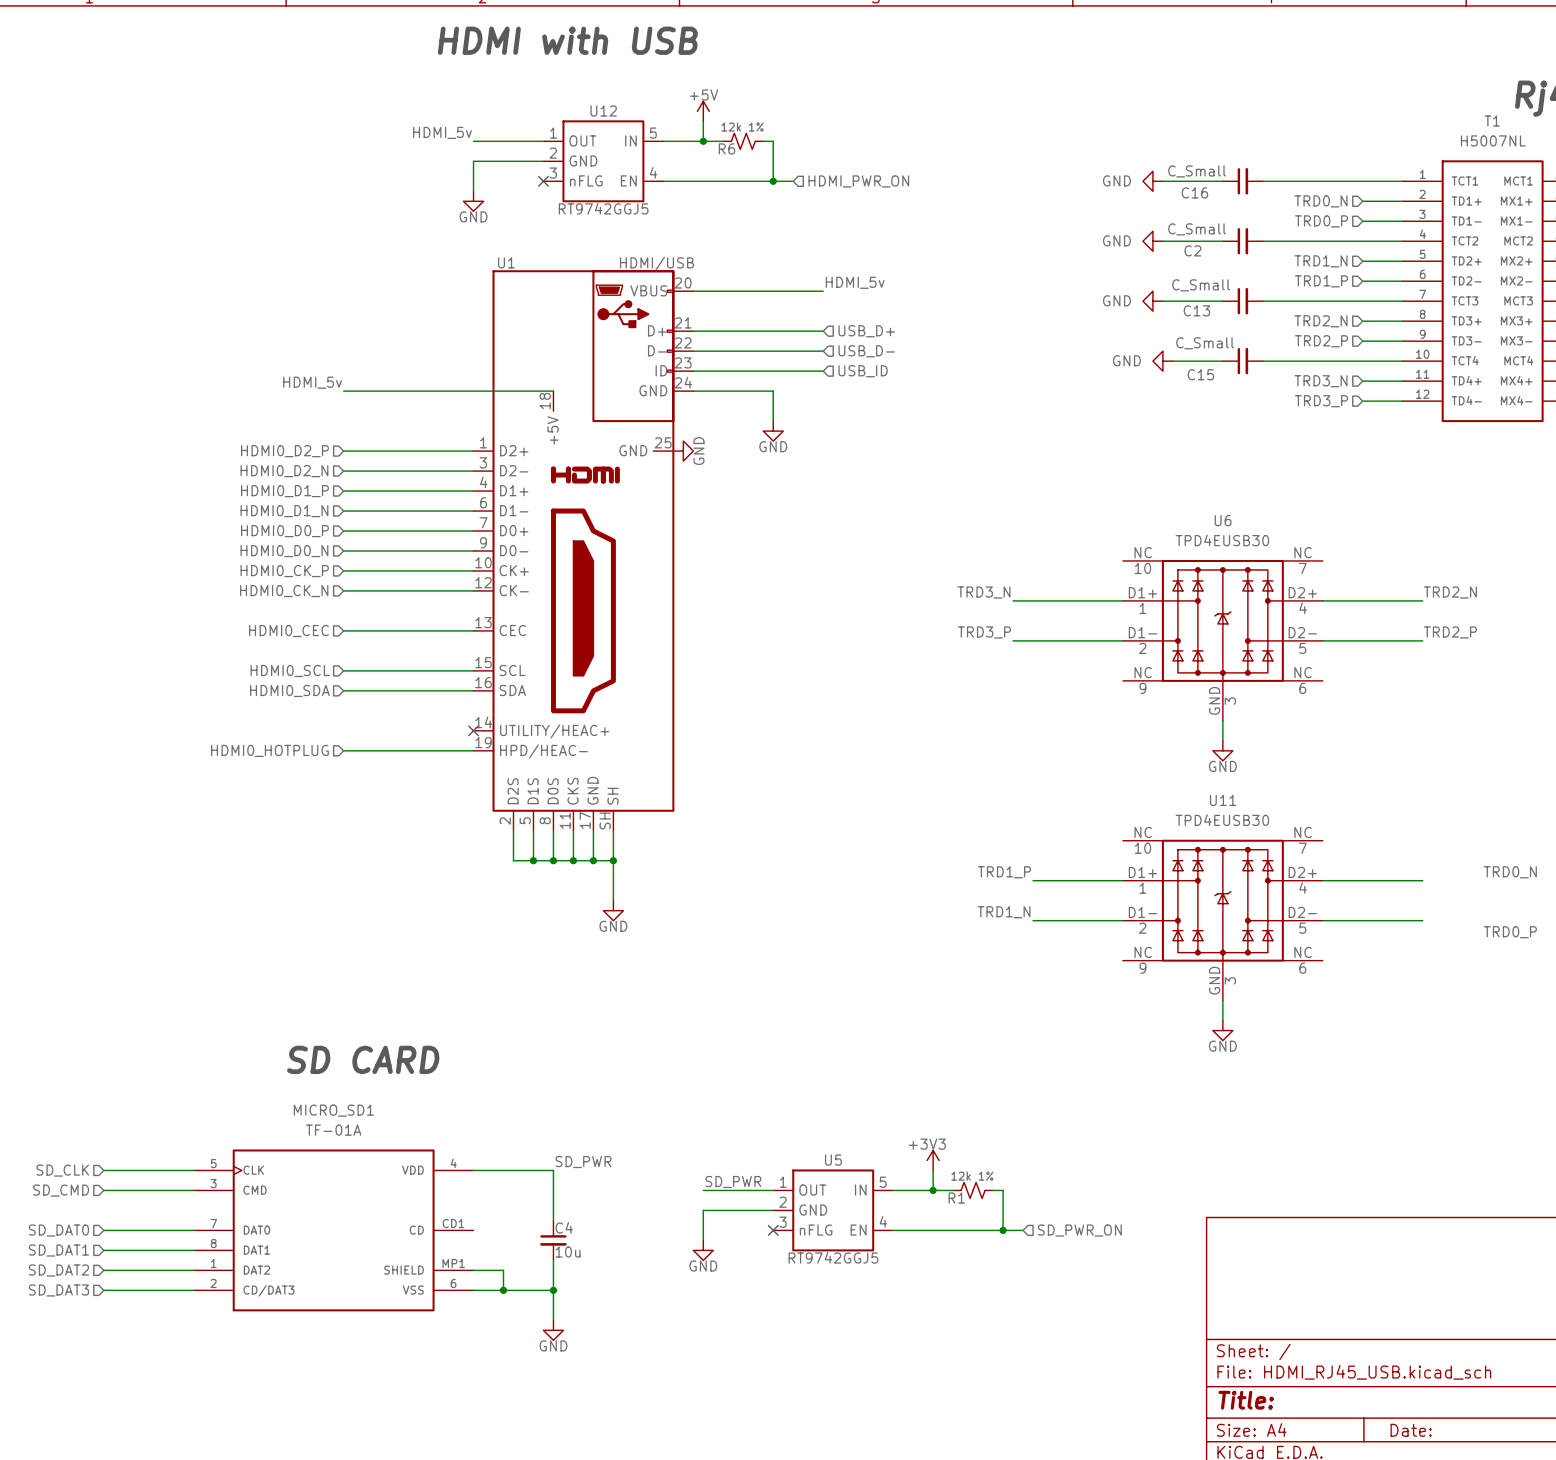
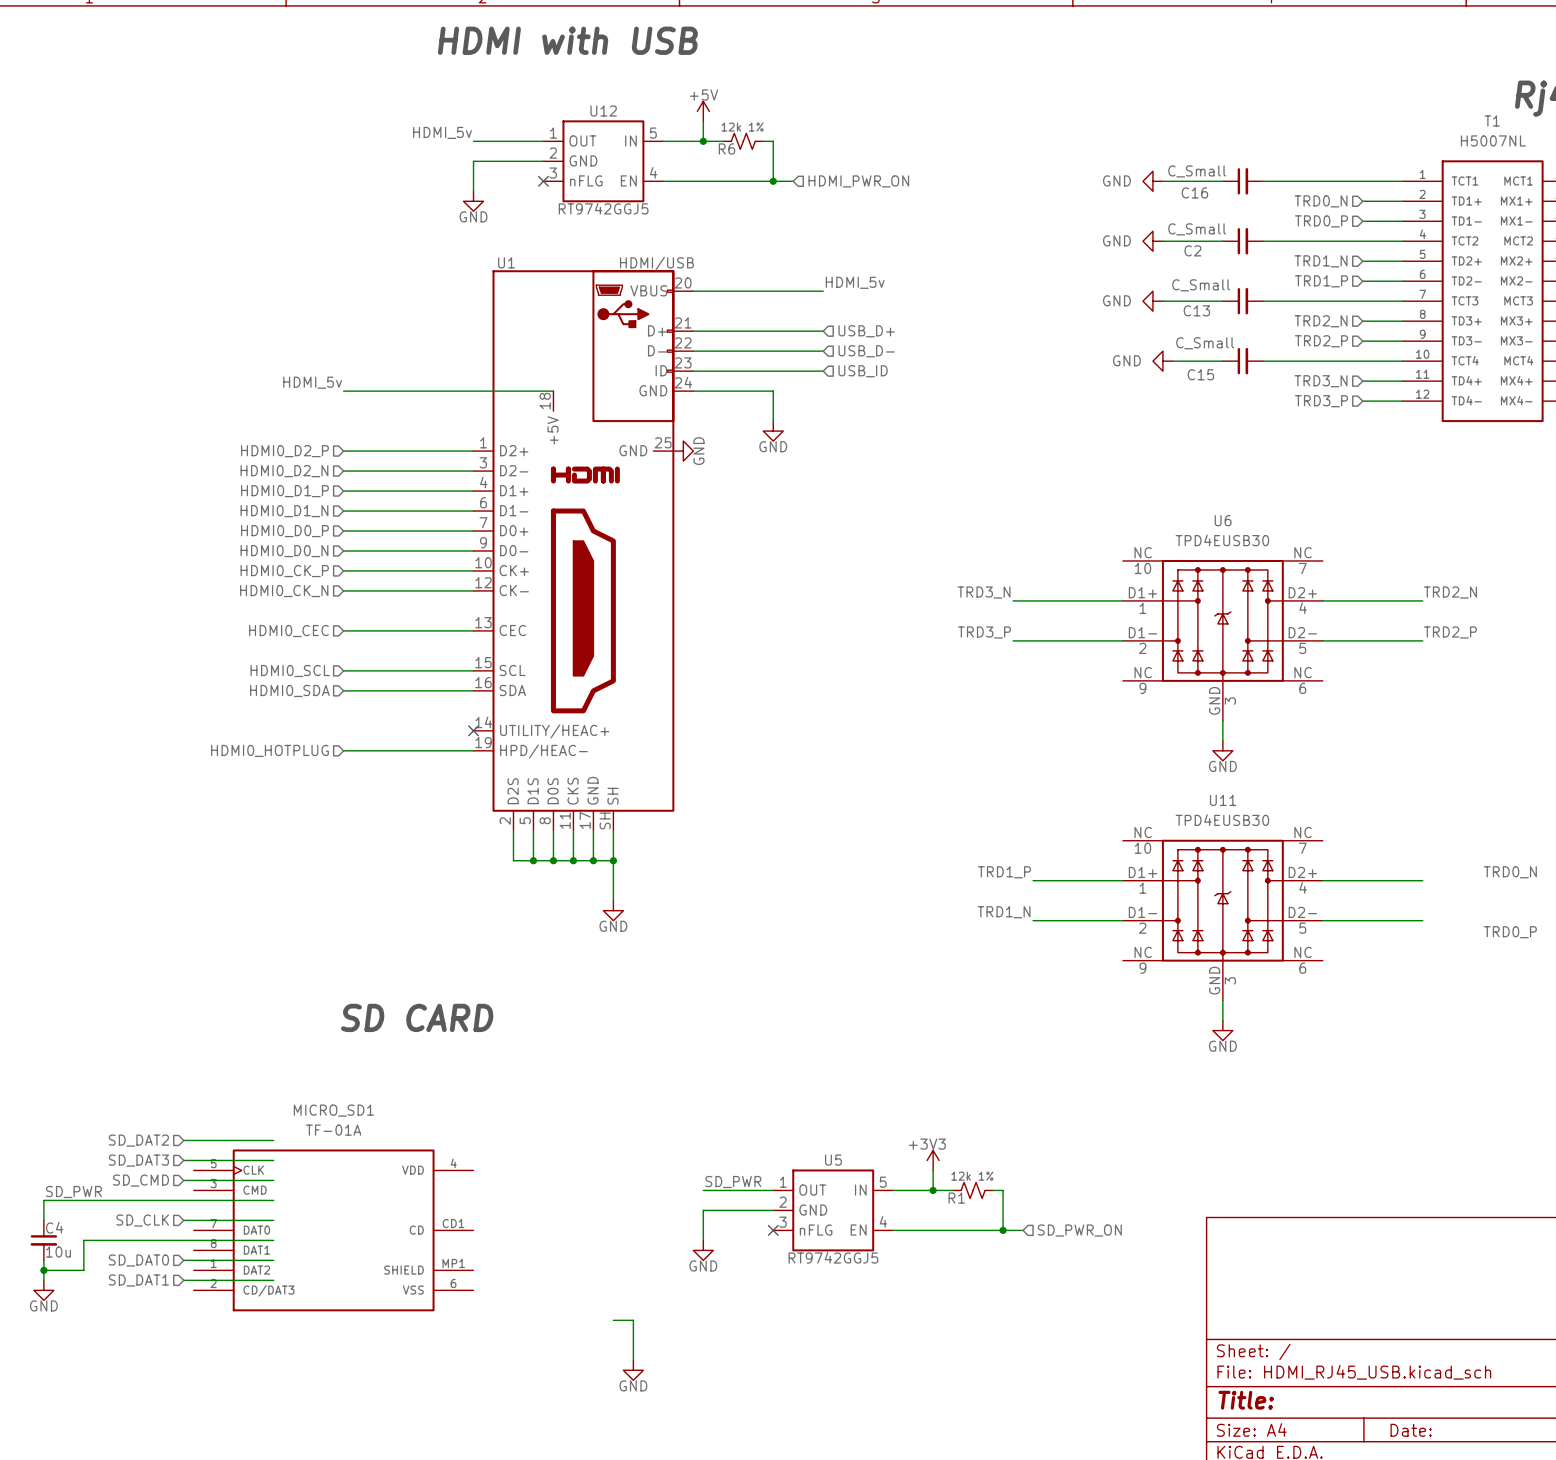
text position: SD CARD (363, 1059) -> SD CARD (417, 1017)
label: SD_PWR (583, 1162) -> none
hierarchical label position: SD_CLK (62, 1170) -> SD_CLK (142, 1220)
wire: (103, 1170) (193, 1170) -> (183, 1160) (273, 1160)
wire: (473, 1170) (553, 1170) (553, 1220) -> none
hierarchical label position: SD_CMD (61, 1190) -> SD_CMD (141, 1180)
wire: (103, 1190) (193, 1190) -> (183, 1180) (273, 1180)
label: none -> SD_PWR (73, 1191)
wire: none -> (273, 1200) (43, 1200) (43, 1220)
hierarchical label position: SD_DAT0 (58, 1230) -> SD_DAT0 (138, 1260)
wire: (103, 1230) (193, 1230) -> (183, 1220) (273, 1220)
wire: none -> (273, 1240) (83, 1240) (83, 1270) (43, 1270)
C4 position: (553, 1240) -> (43, 1240)
hierarchical label position: SD_DAT1 (58, 1250) -> SD_DAT1 (138, 1280)
wire: (103, 1250) (193, 1250) -> (183, 1140) (273, 1140)
wire: none -> (43, 1260) (43, 1280)
wire: (553, 1260) (553, 1320) -> none
junction: none -> (43, 1270)
hierarchical label position: SD_DAT2 (58, 1270) -> SD_DAT2 (138, 1140)
wire: (103, 1270) (193, 1270) -> (183, 1260) (273, 1260)
wire: (473, 1270) (503, 1270) (503, 1290) -> none
power symbol: none -> GND (43, 1290)
hierarchical label position: SD_DAT3 (58, 1290) -> SD_DAT3 (138, 1160)
wire: (103, 1290) (193, 1290) -> (183, 1280) (273, 1280)
wire: (473, 1290) (553, 1290) -> none
junction: (503, 1290) -> none
junction: (553, 1290) -> none
wire: none -> (613, 1320) (633, 1320) (633, 1360)
power symbol position: GND (553, 1330) -> GND (633, 1370)

